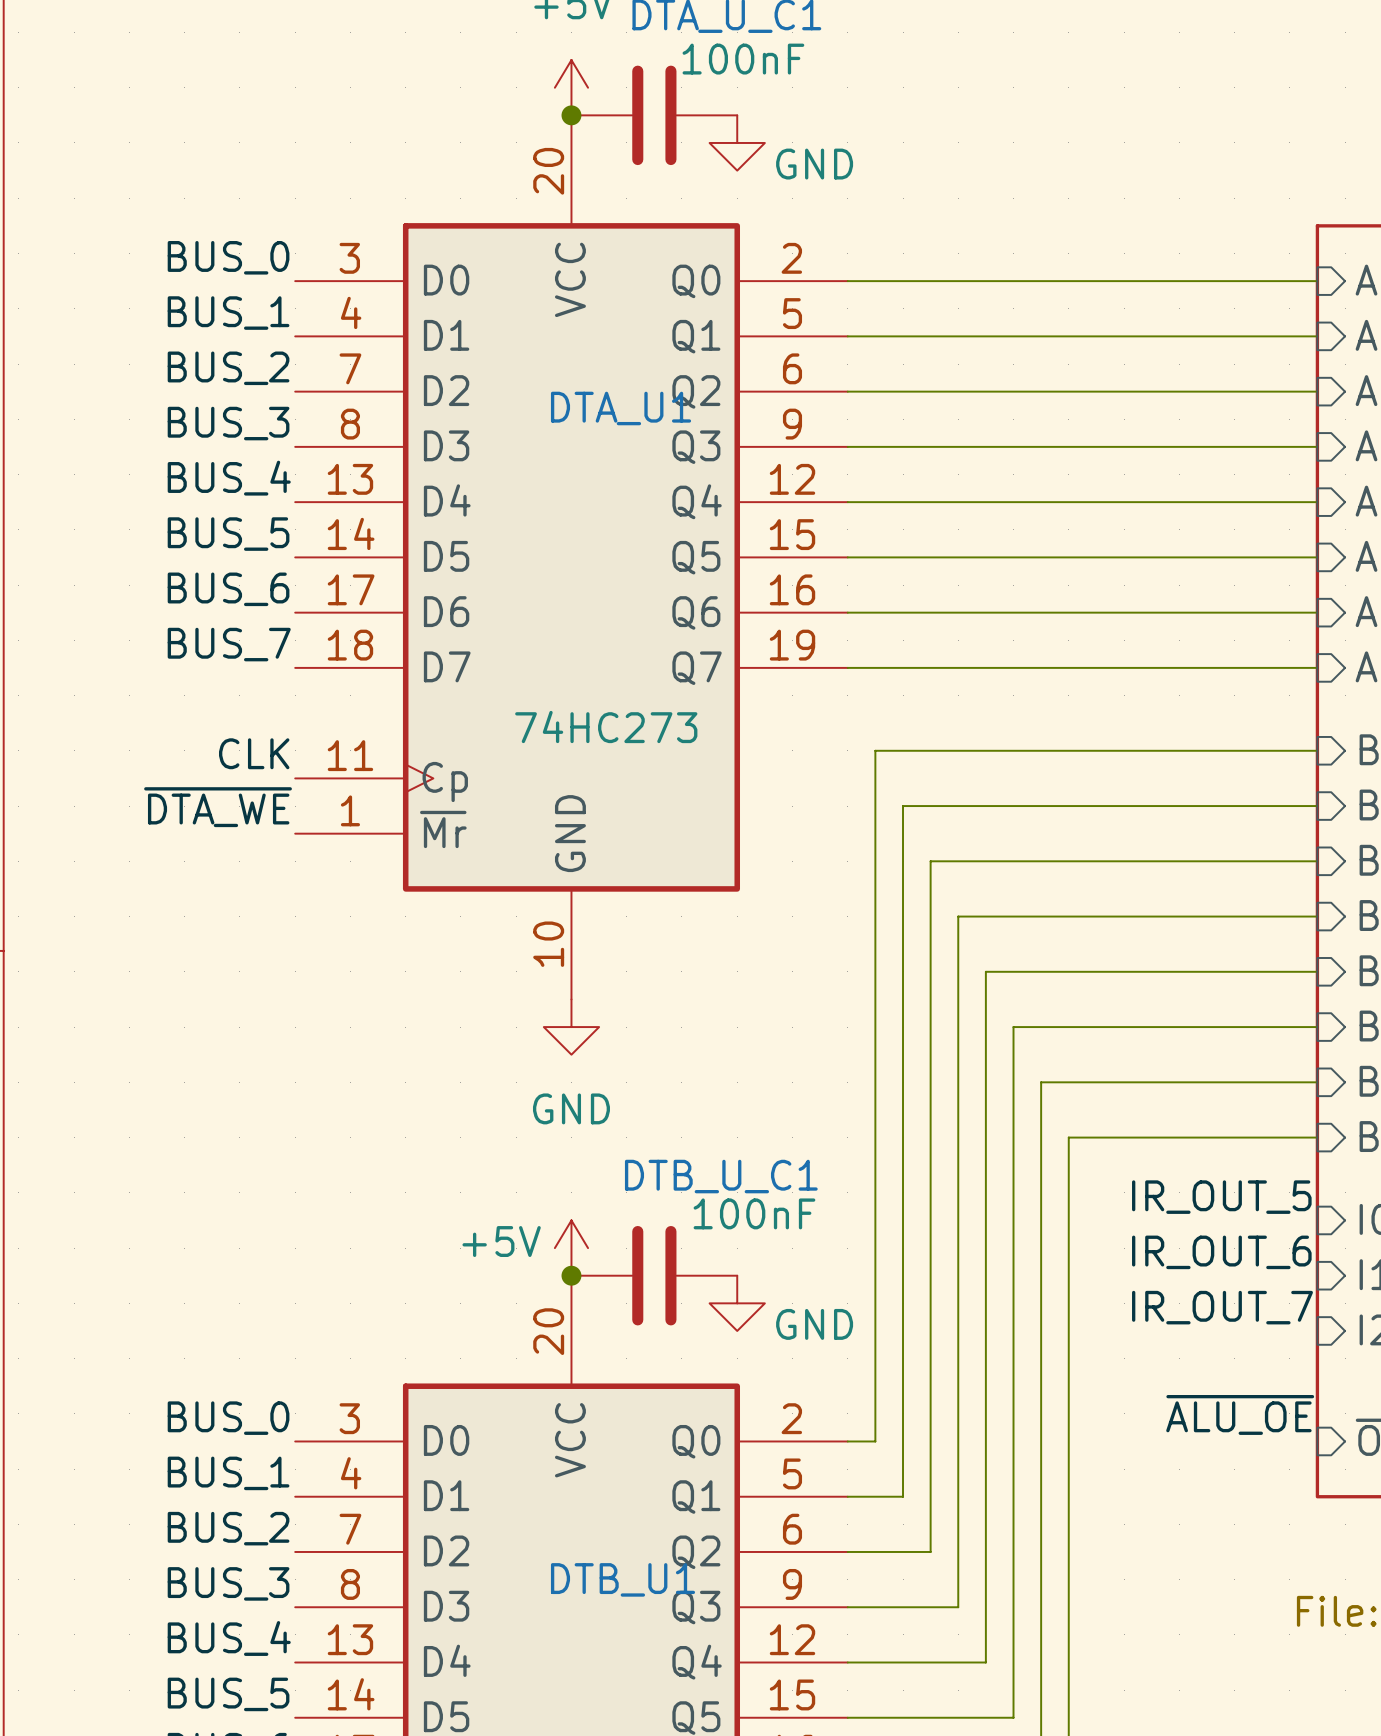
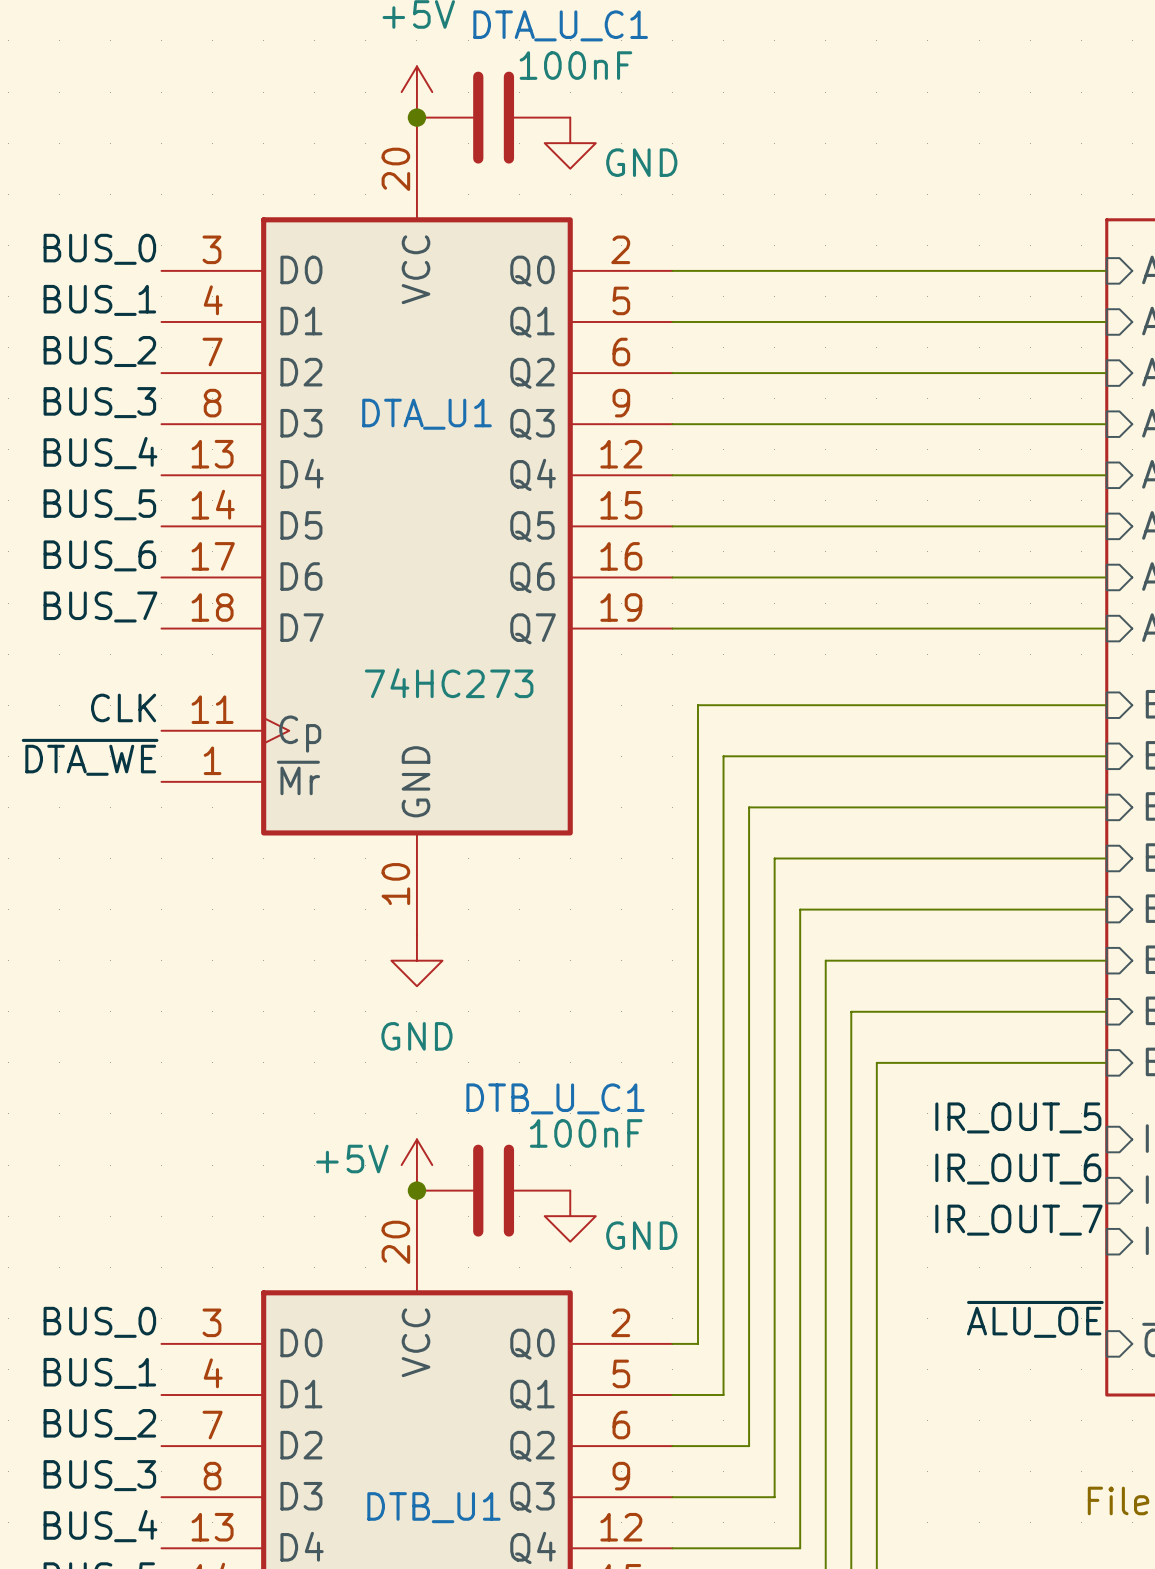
DTA_U1 name position: DTA_U1 (621, 408) -> DTA_U1 (427, 414)
DTB_U1 name position: DTB_U1 (622, 1579) -> DTB_U1 (433, 1507)

